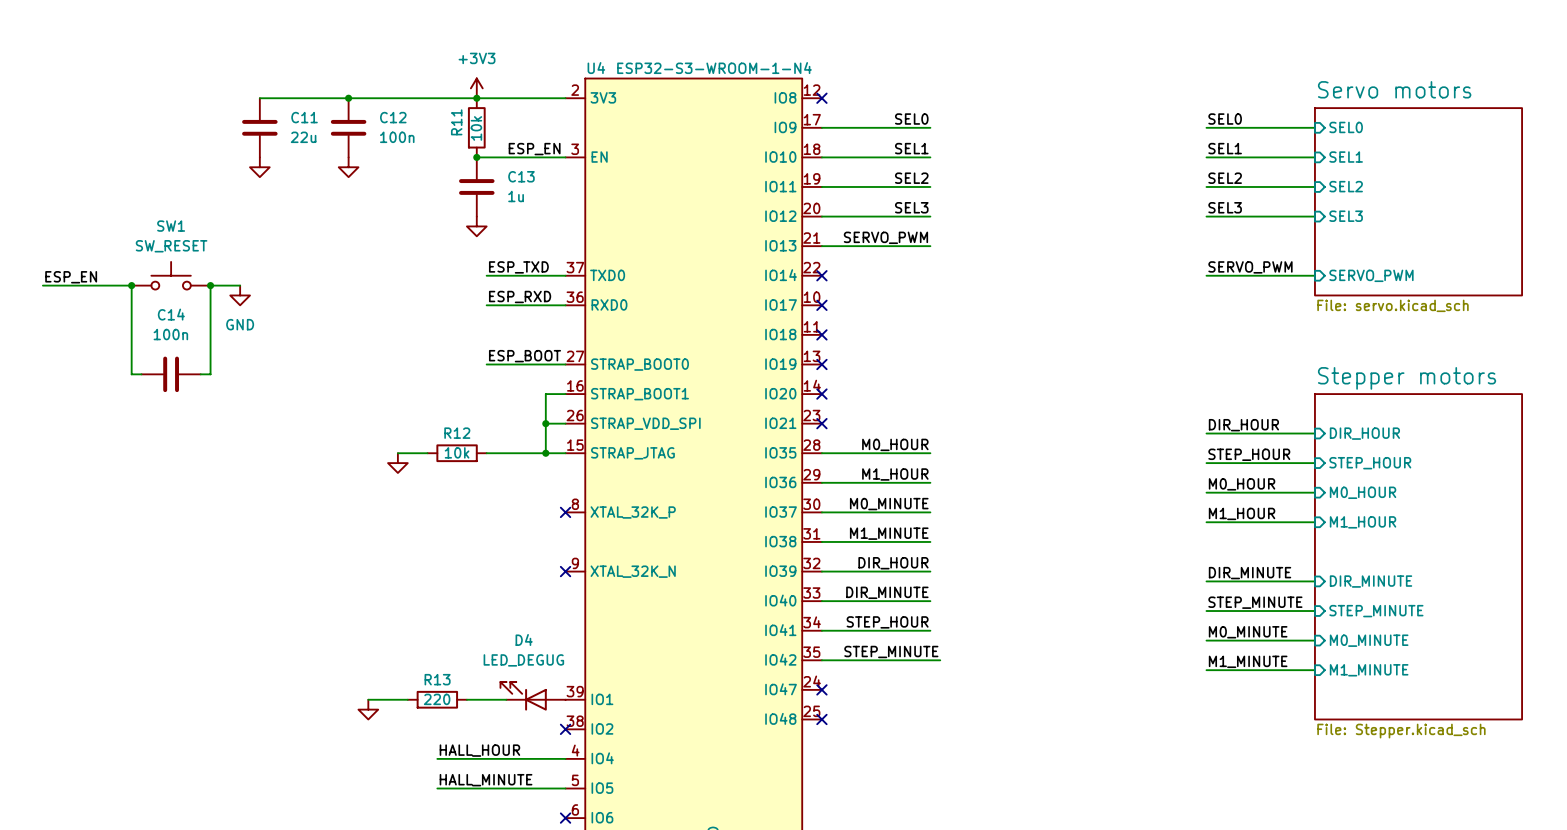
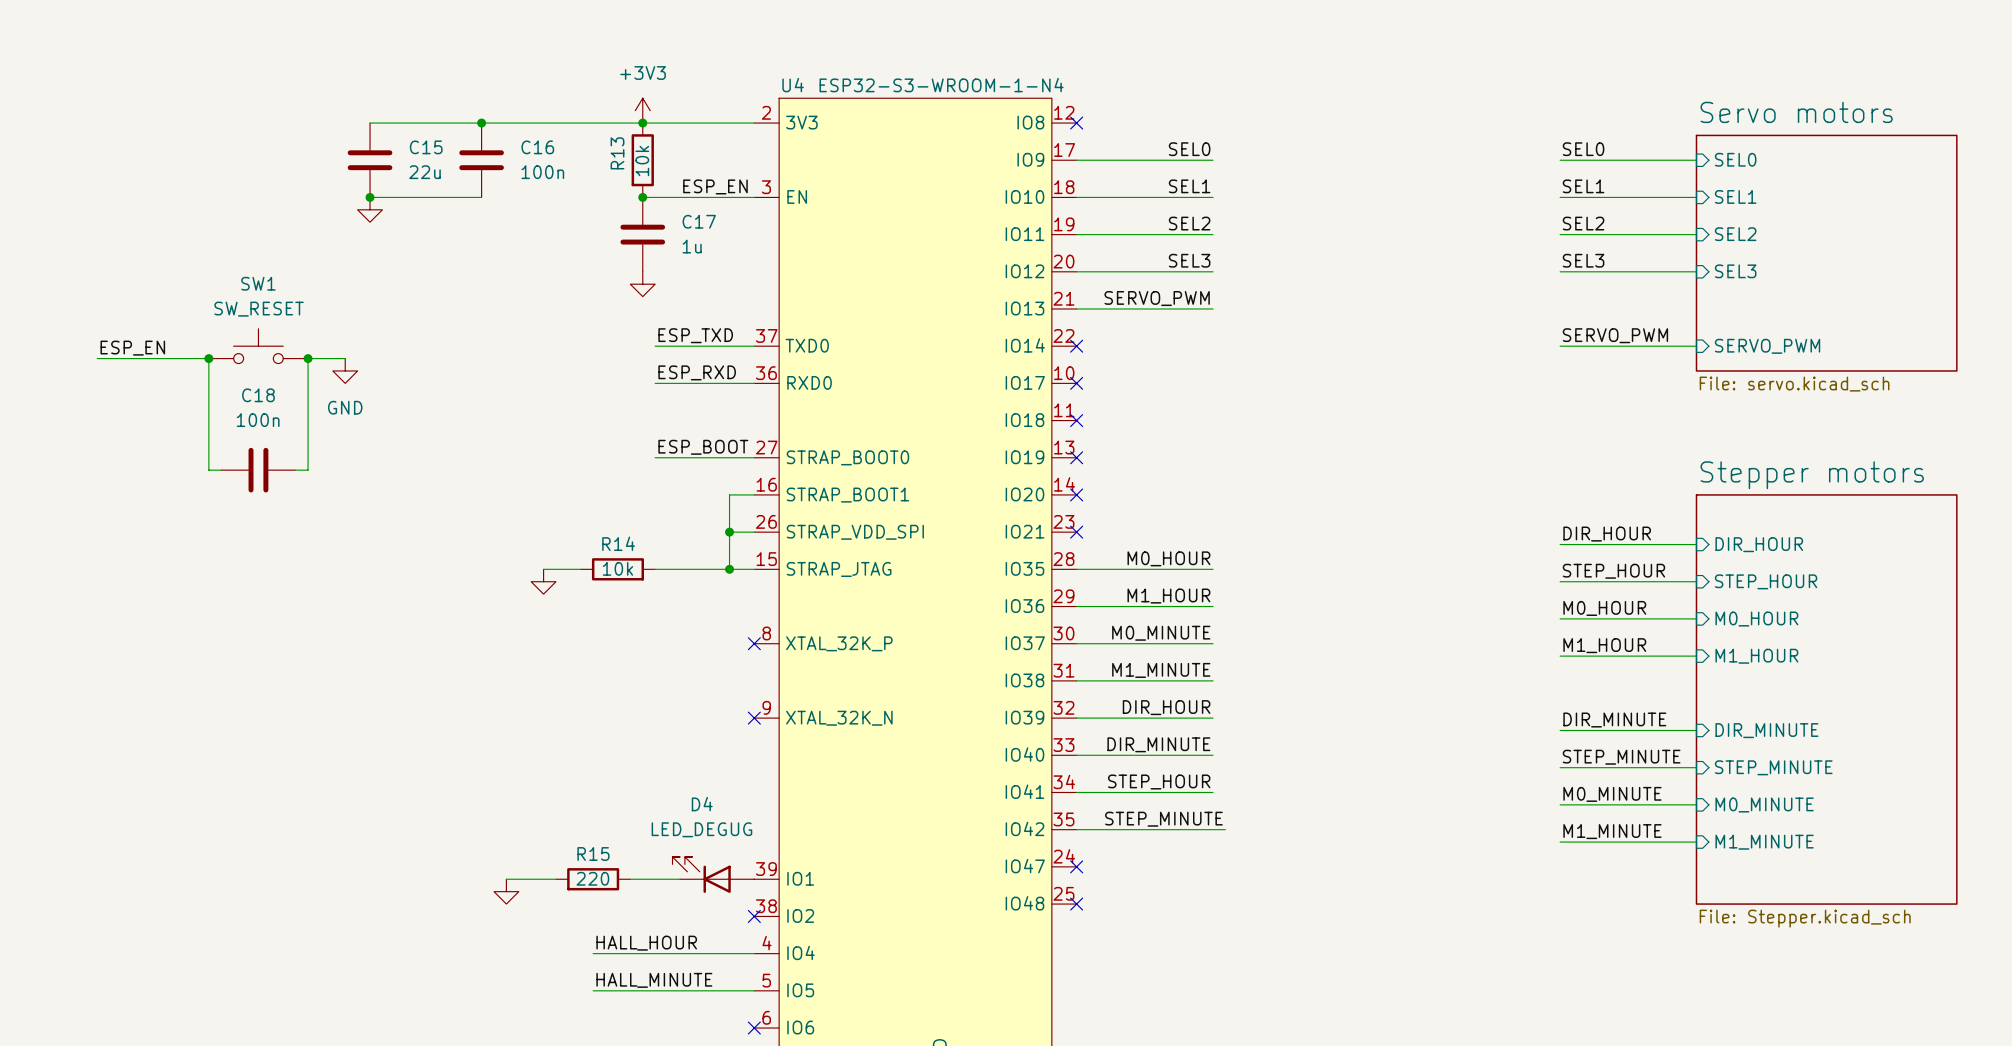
C11 name: C11 (304, 117) -> C15 (426, 147)
C12 name: C12 (393, 117) -> C16 (537, 147)
R11 name: R11 (456, 122) -> R13 (617, 153)
wire: none -> (370, 197) (481, 197)
junction: none -> (370, 197)
power symbol: (348, 167) -> none
C13 name: C13 (521, 176) -> C17 (699, 221)
C14 name: C14 (171, 314) -> C18 (258, 395)
R12 name: R12 (457, 433) -> R14 (618, 543)
R13 name: R13 (437, 679) -> R15 (593, 854)

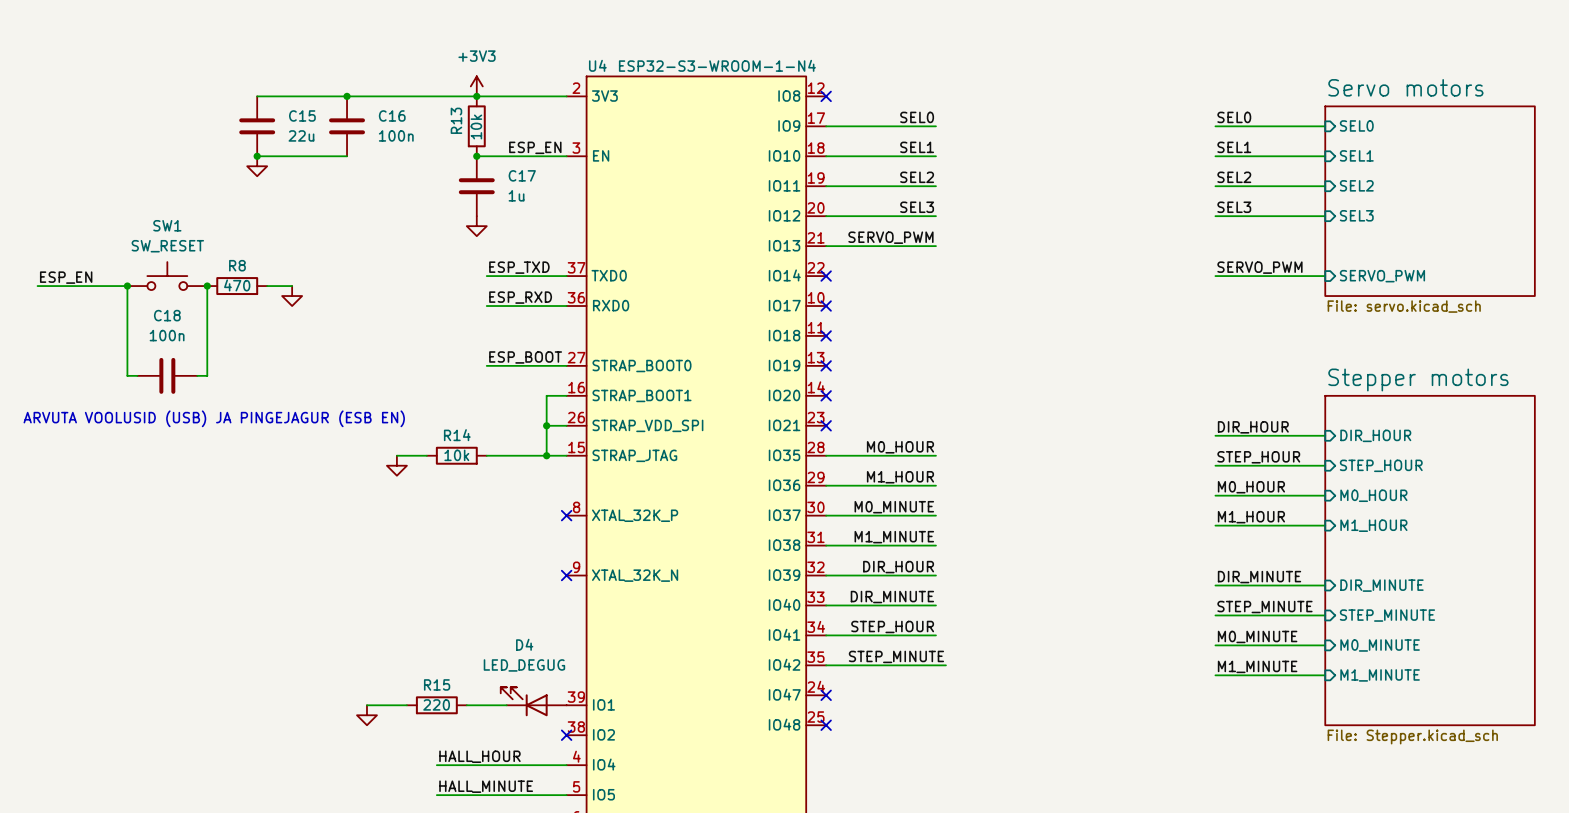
wire: (308, 358) (345, 358) -> none
R8: none -> 470 (237, 286)
wire: none -> (267, 286) (292, 286)
power symbol: GND (345, 370) -> none
power symbol: none -> (292, 296)
text: none -> ARVUTA VOOLUSID (USB) JA PINGEJAGUR (ESB EN) (214, 418)

